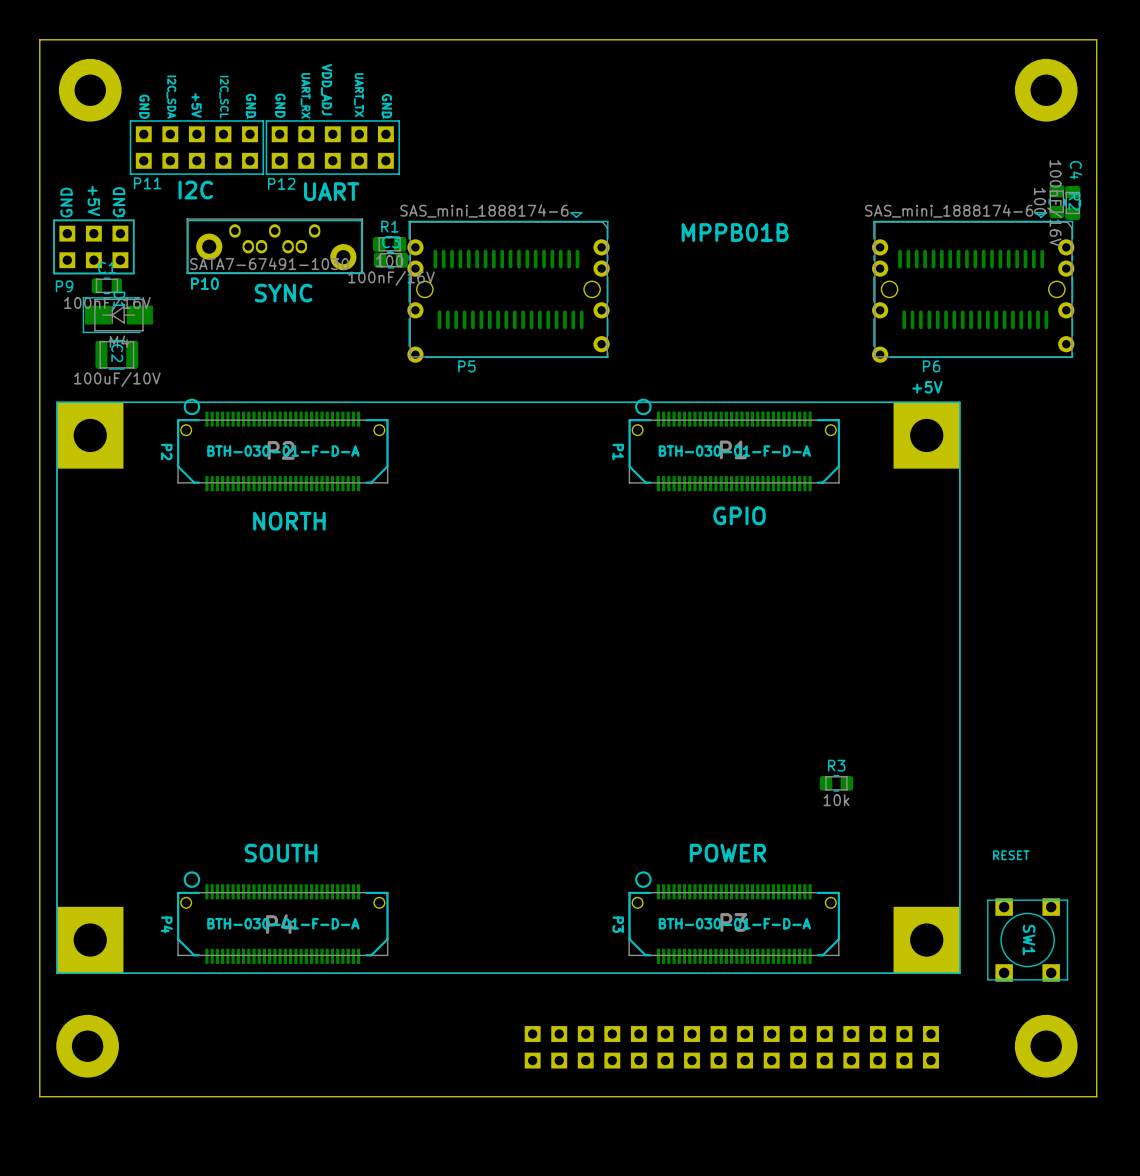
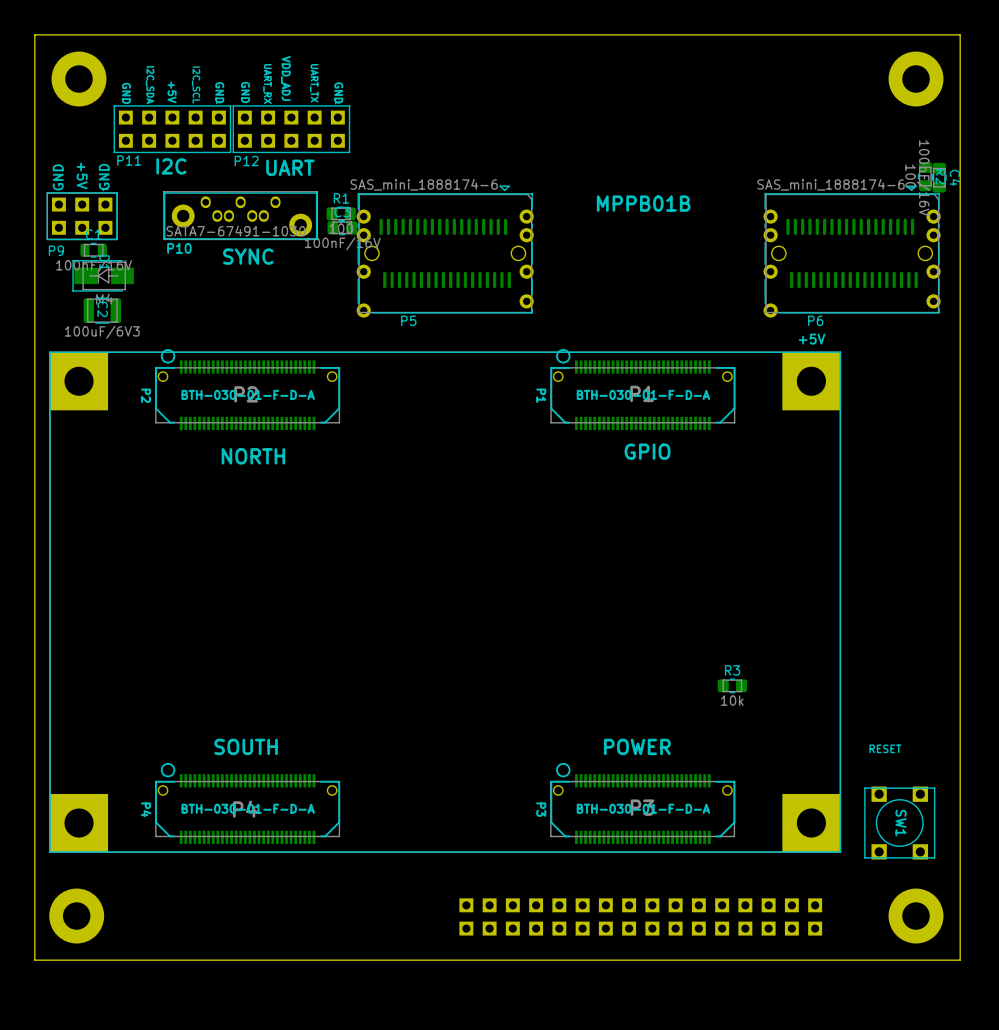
C4 name position: C4 (1076, 170) -> C4 (955, 177)
C2 value: 100uF/10V (117, 379) -> 100uF/6V3 (102, 332)

